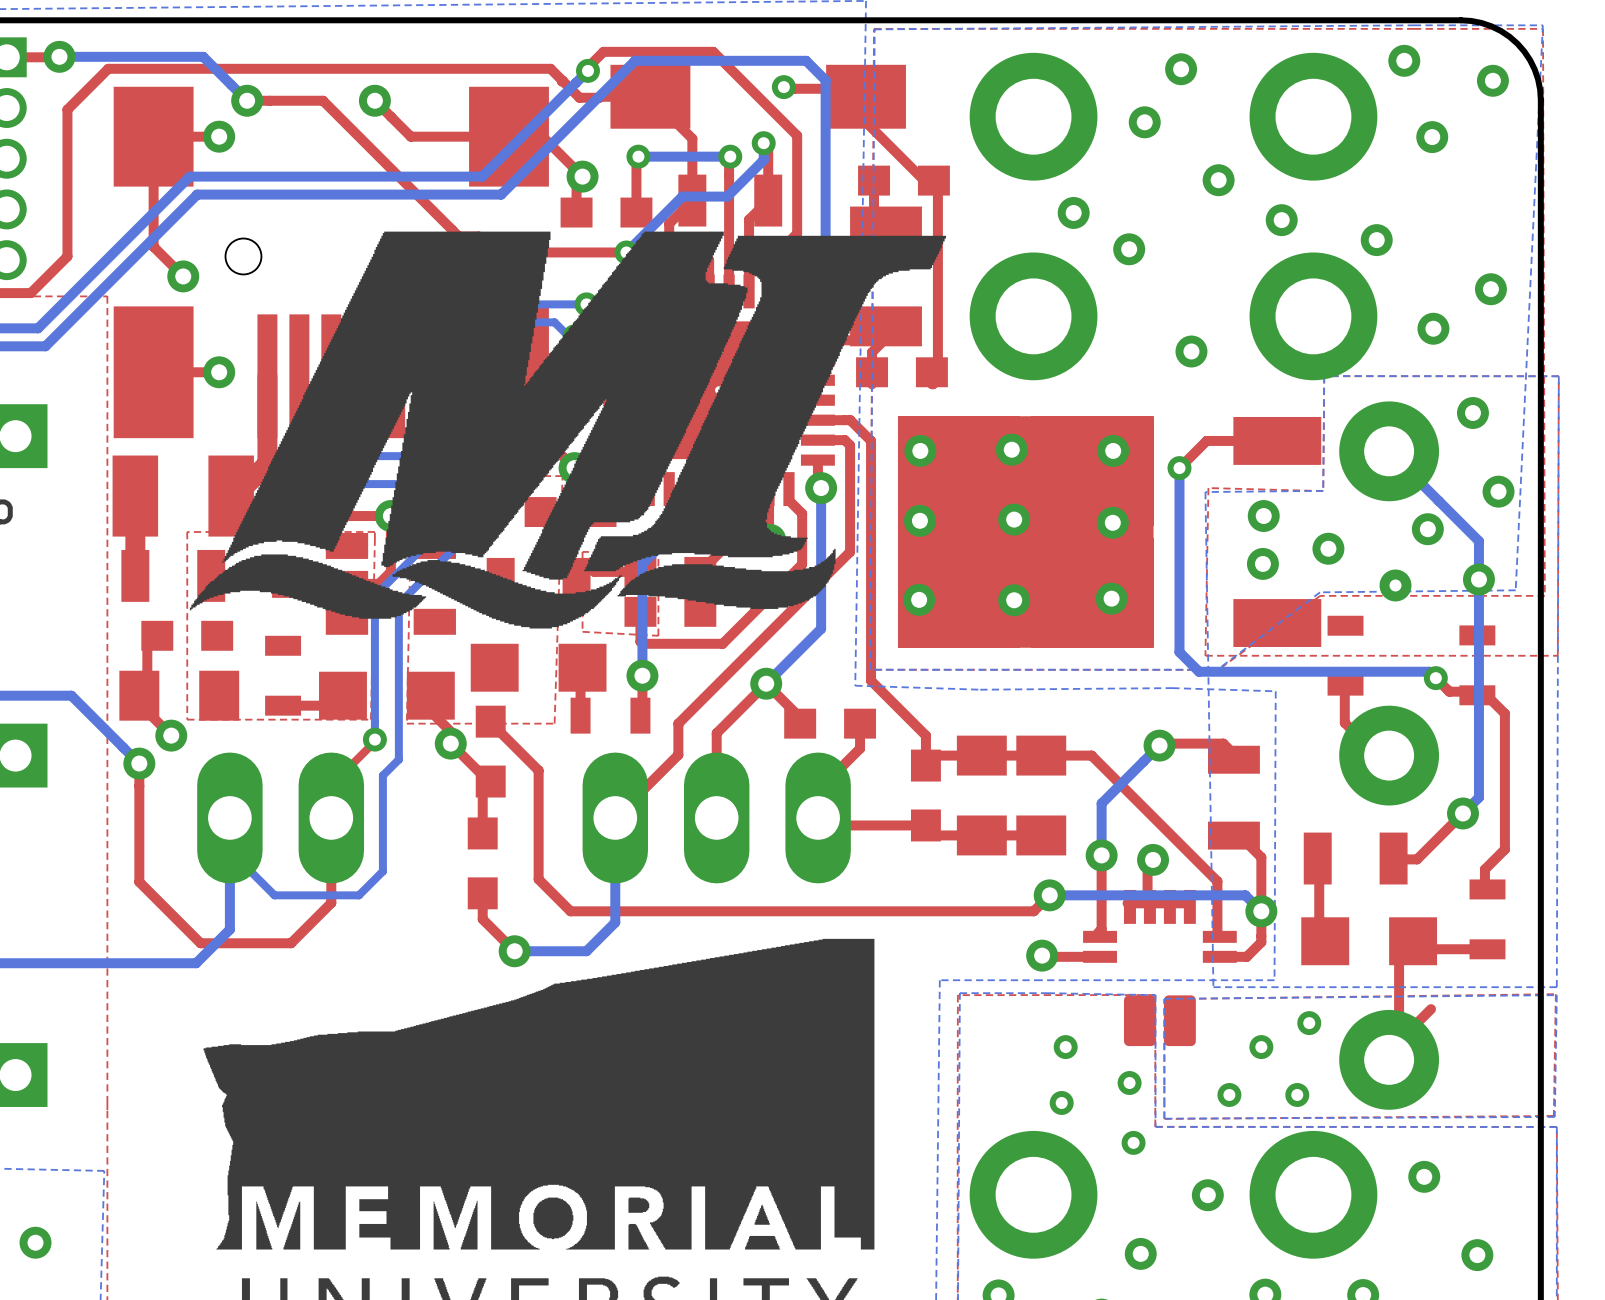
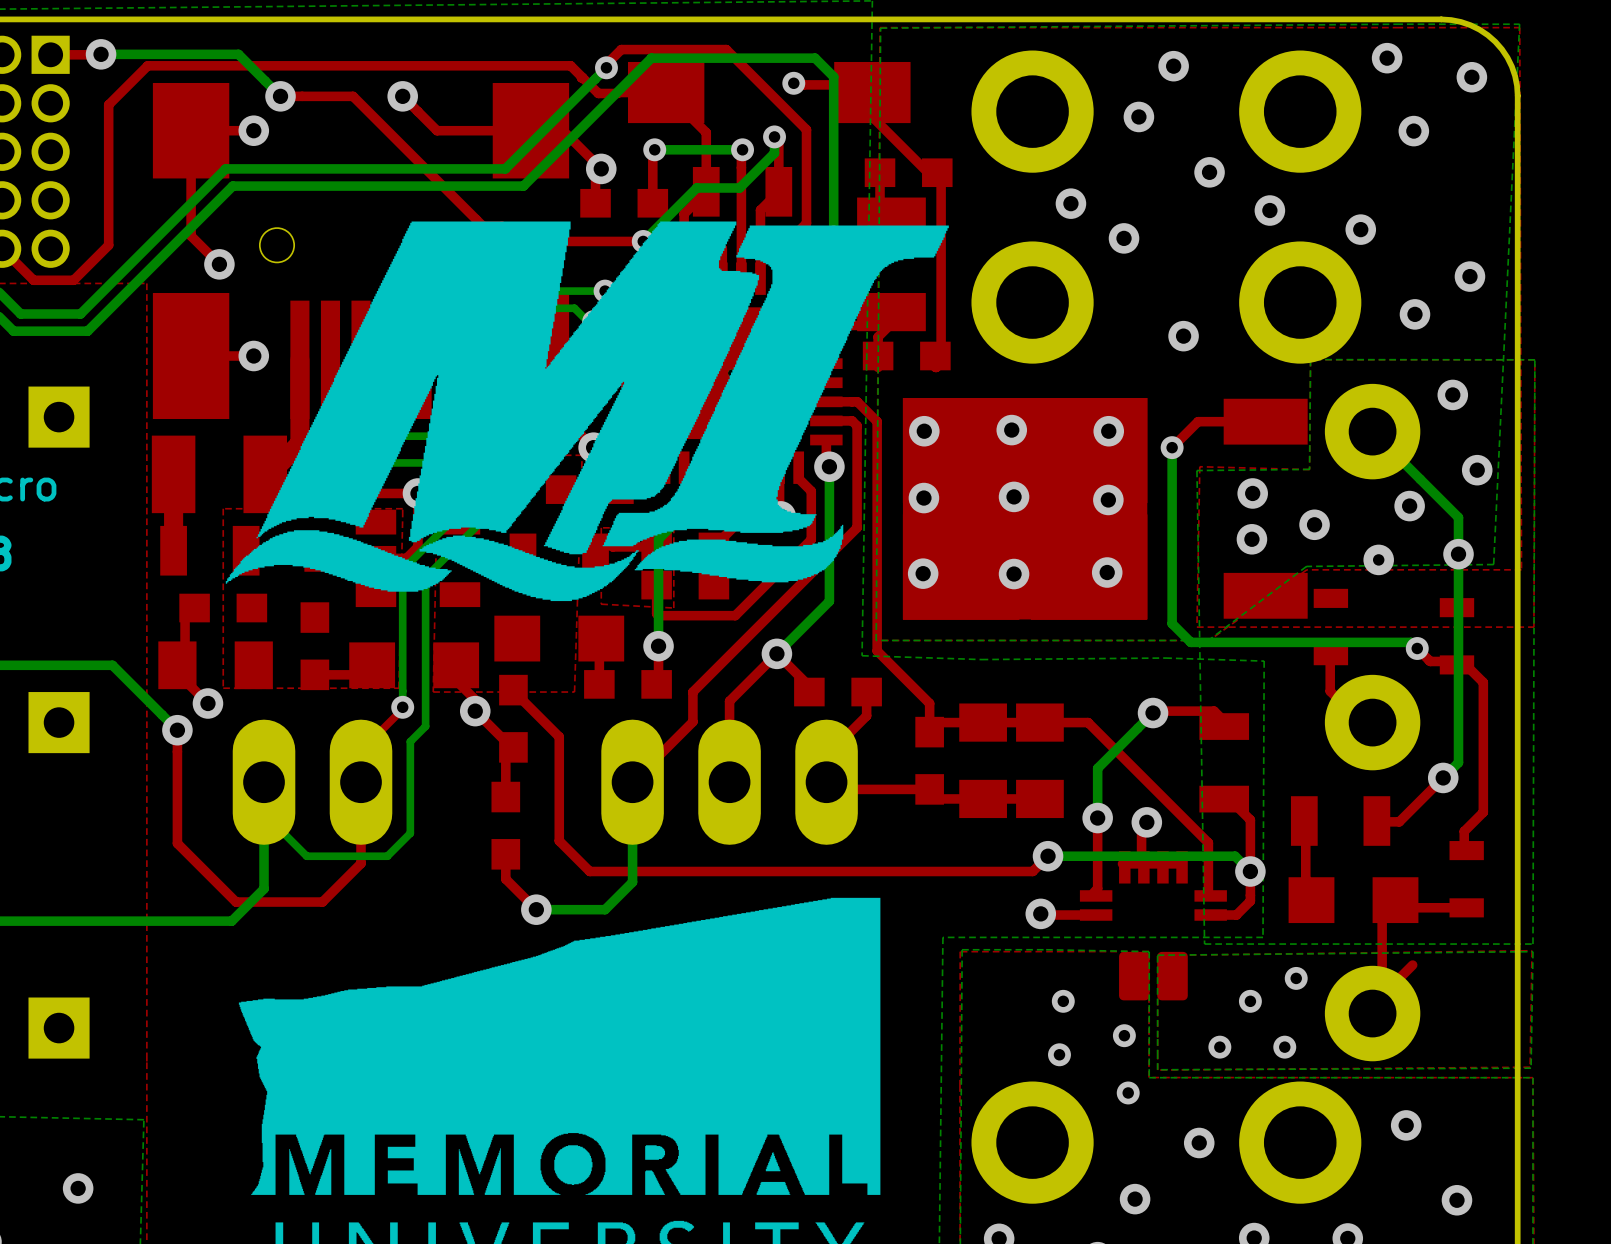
part footprint: [265, 635, 302, 716] -> [300, 602, 330, 691]
part footprint: [570, 697, 651, 734] -> [584, 670, 672, 699]

